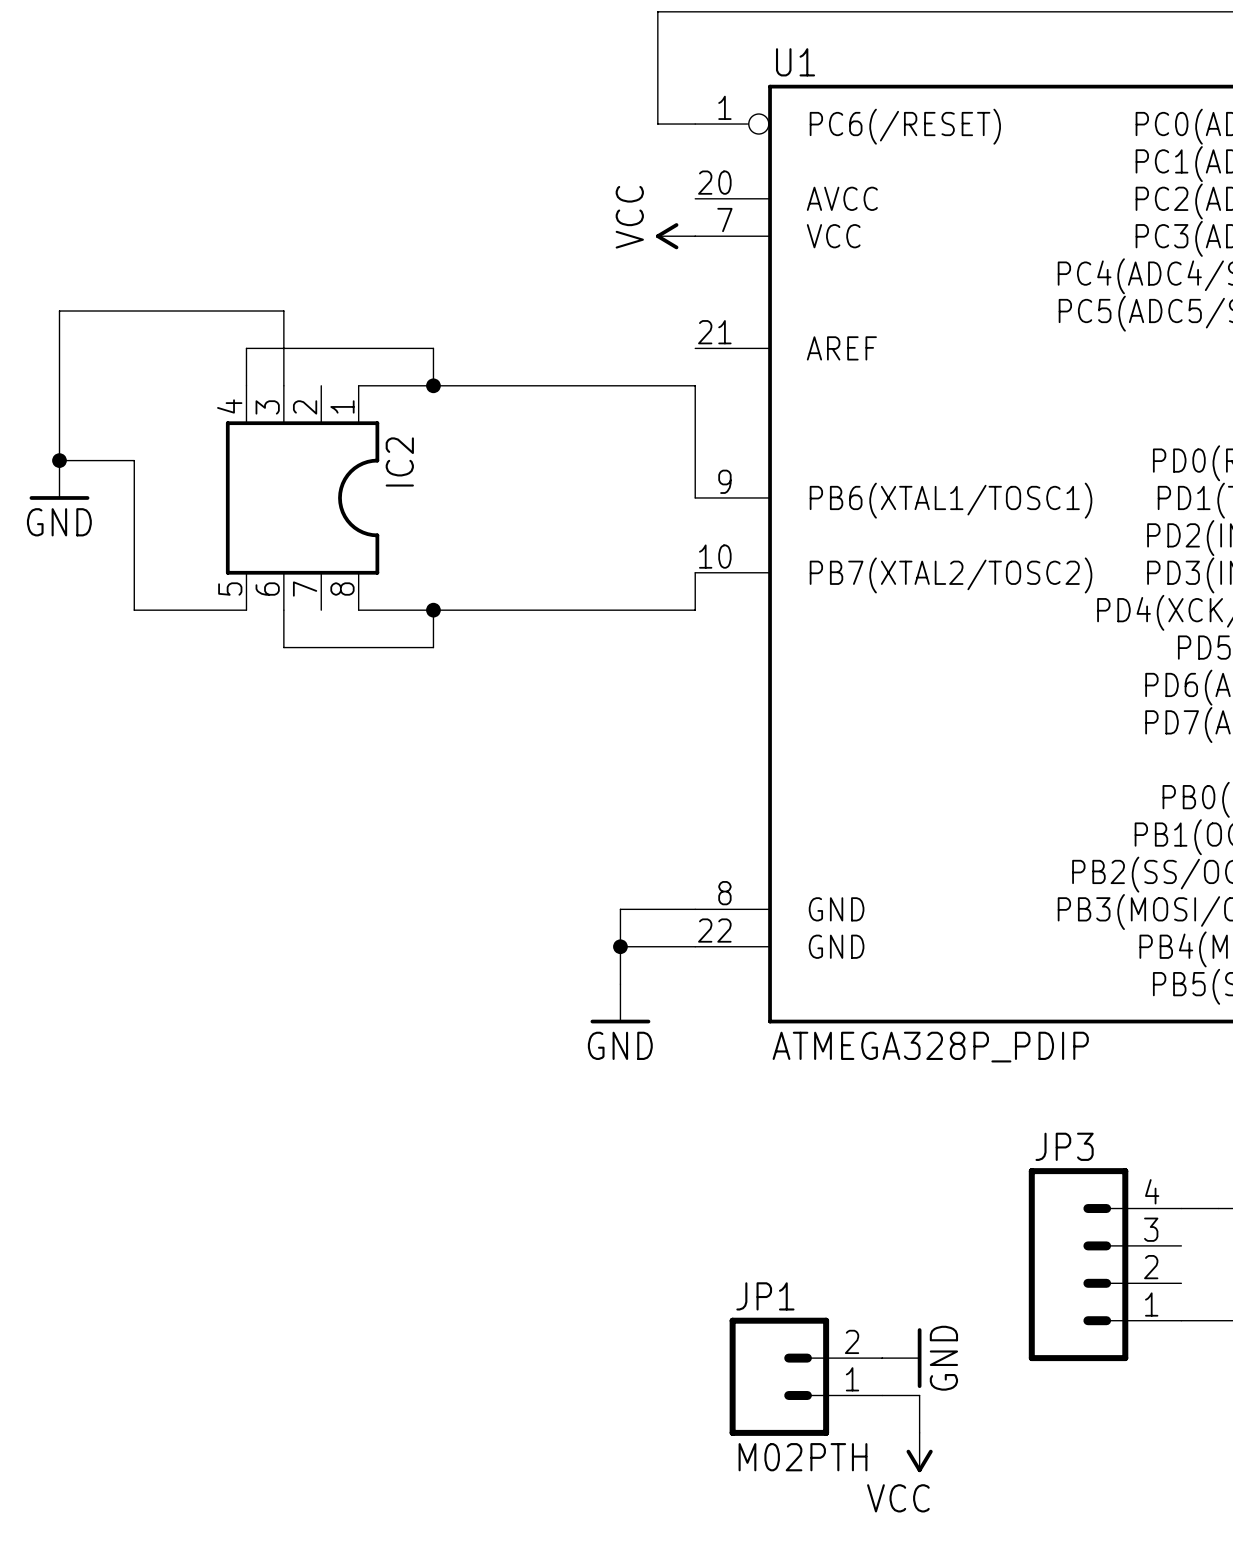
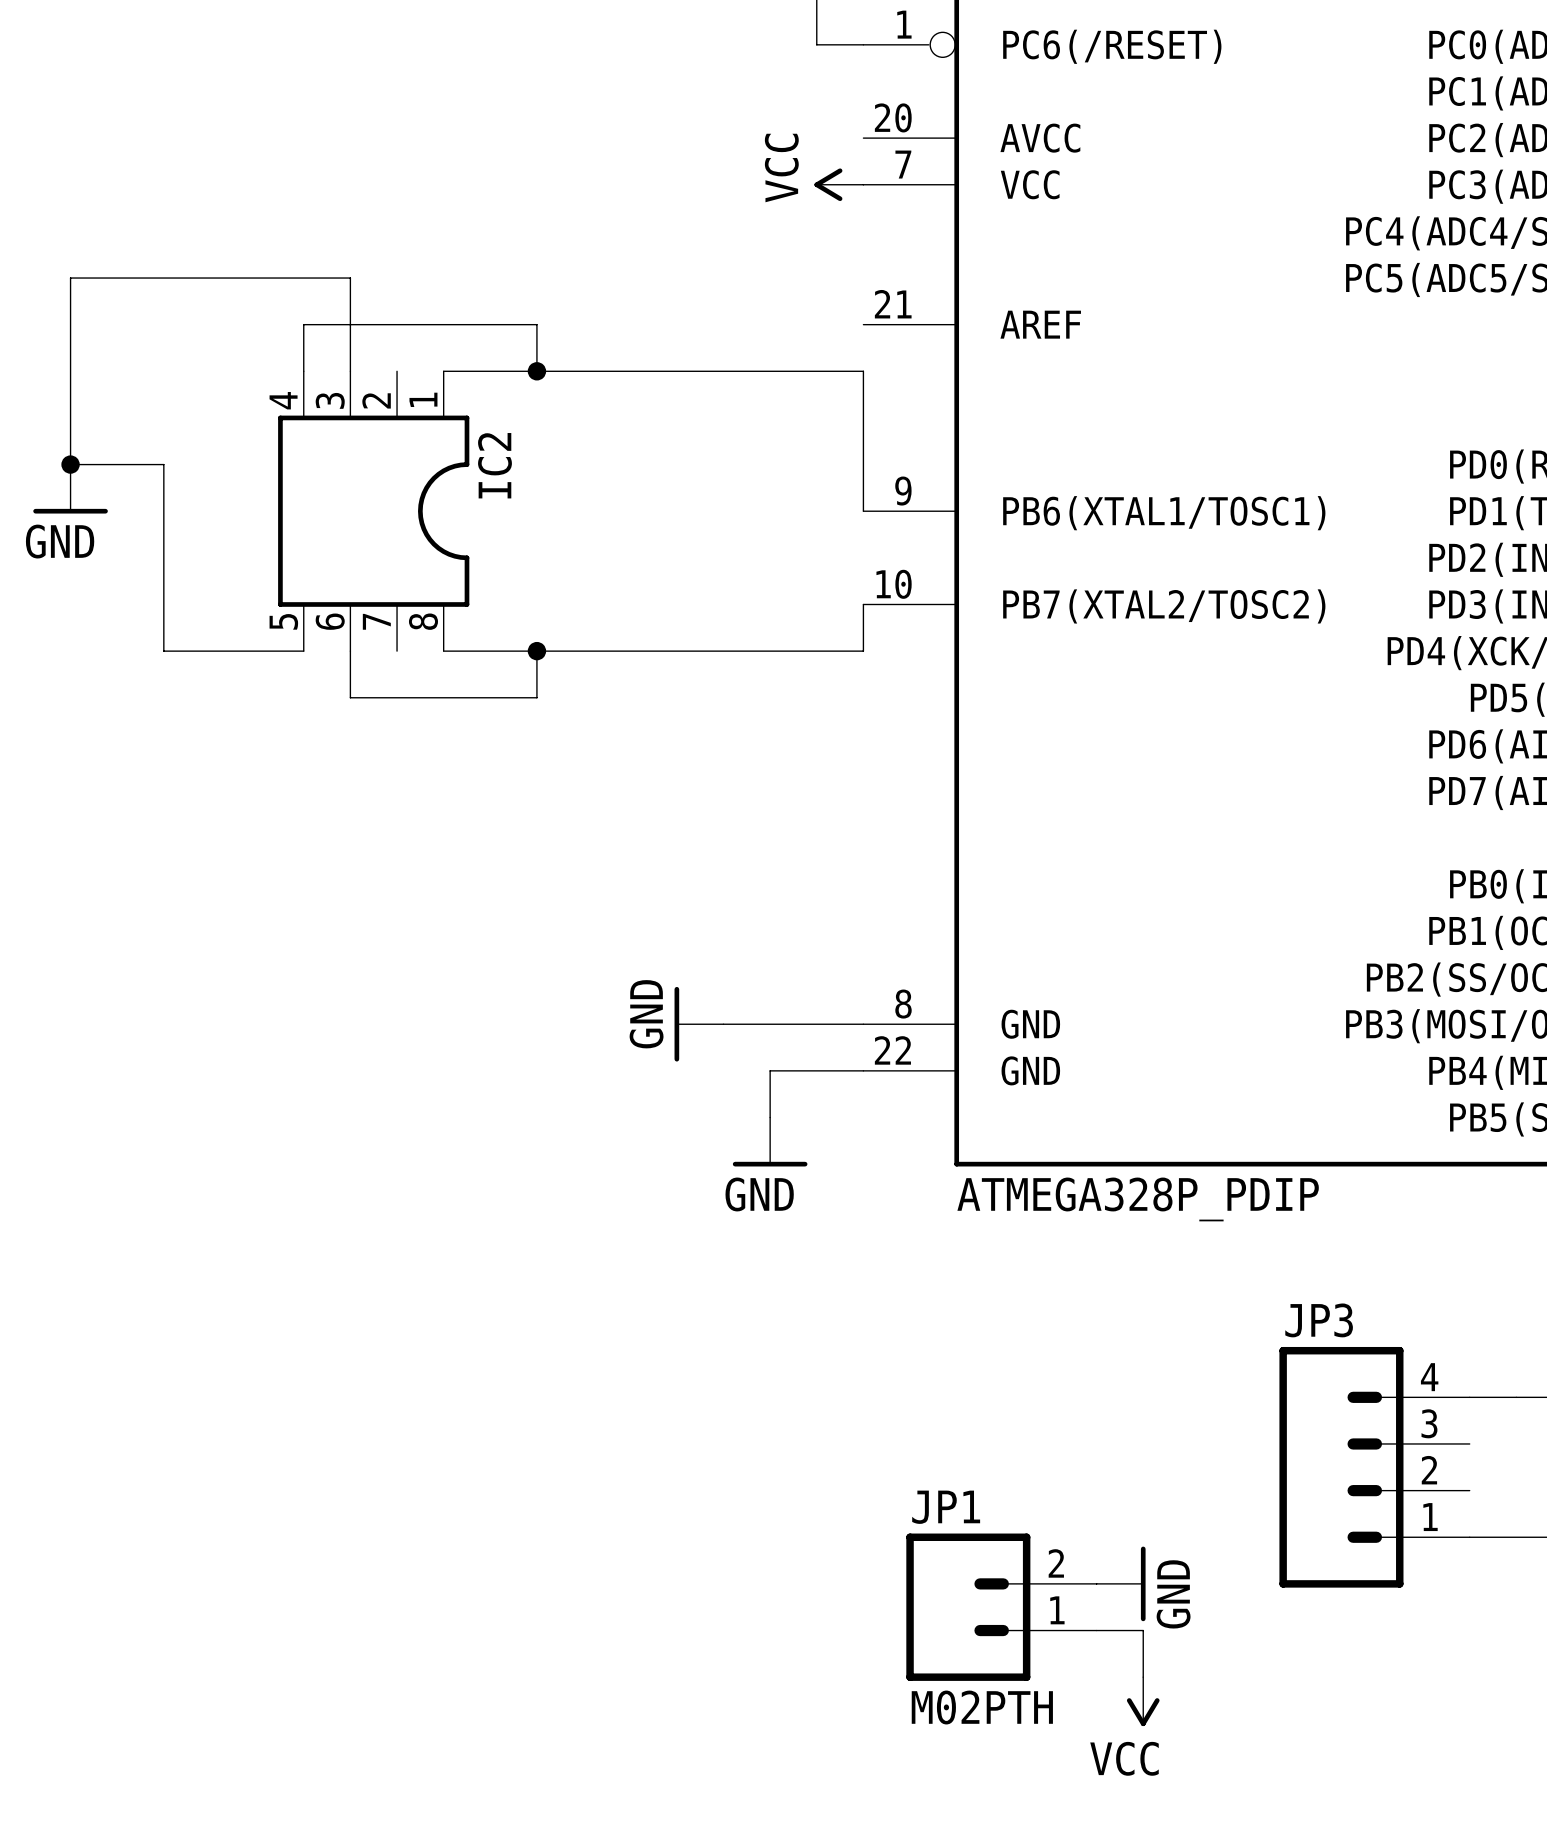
power symbol: none -> GND (699, 1024)
wire: (620, 909) (620, 946) -> (770, 1024) (723, 1024)
junction: (620, 946) -> none

